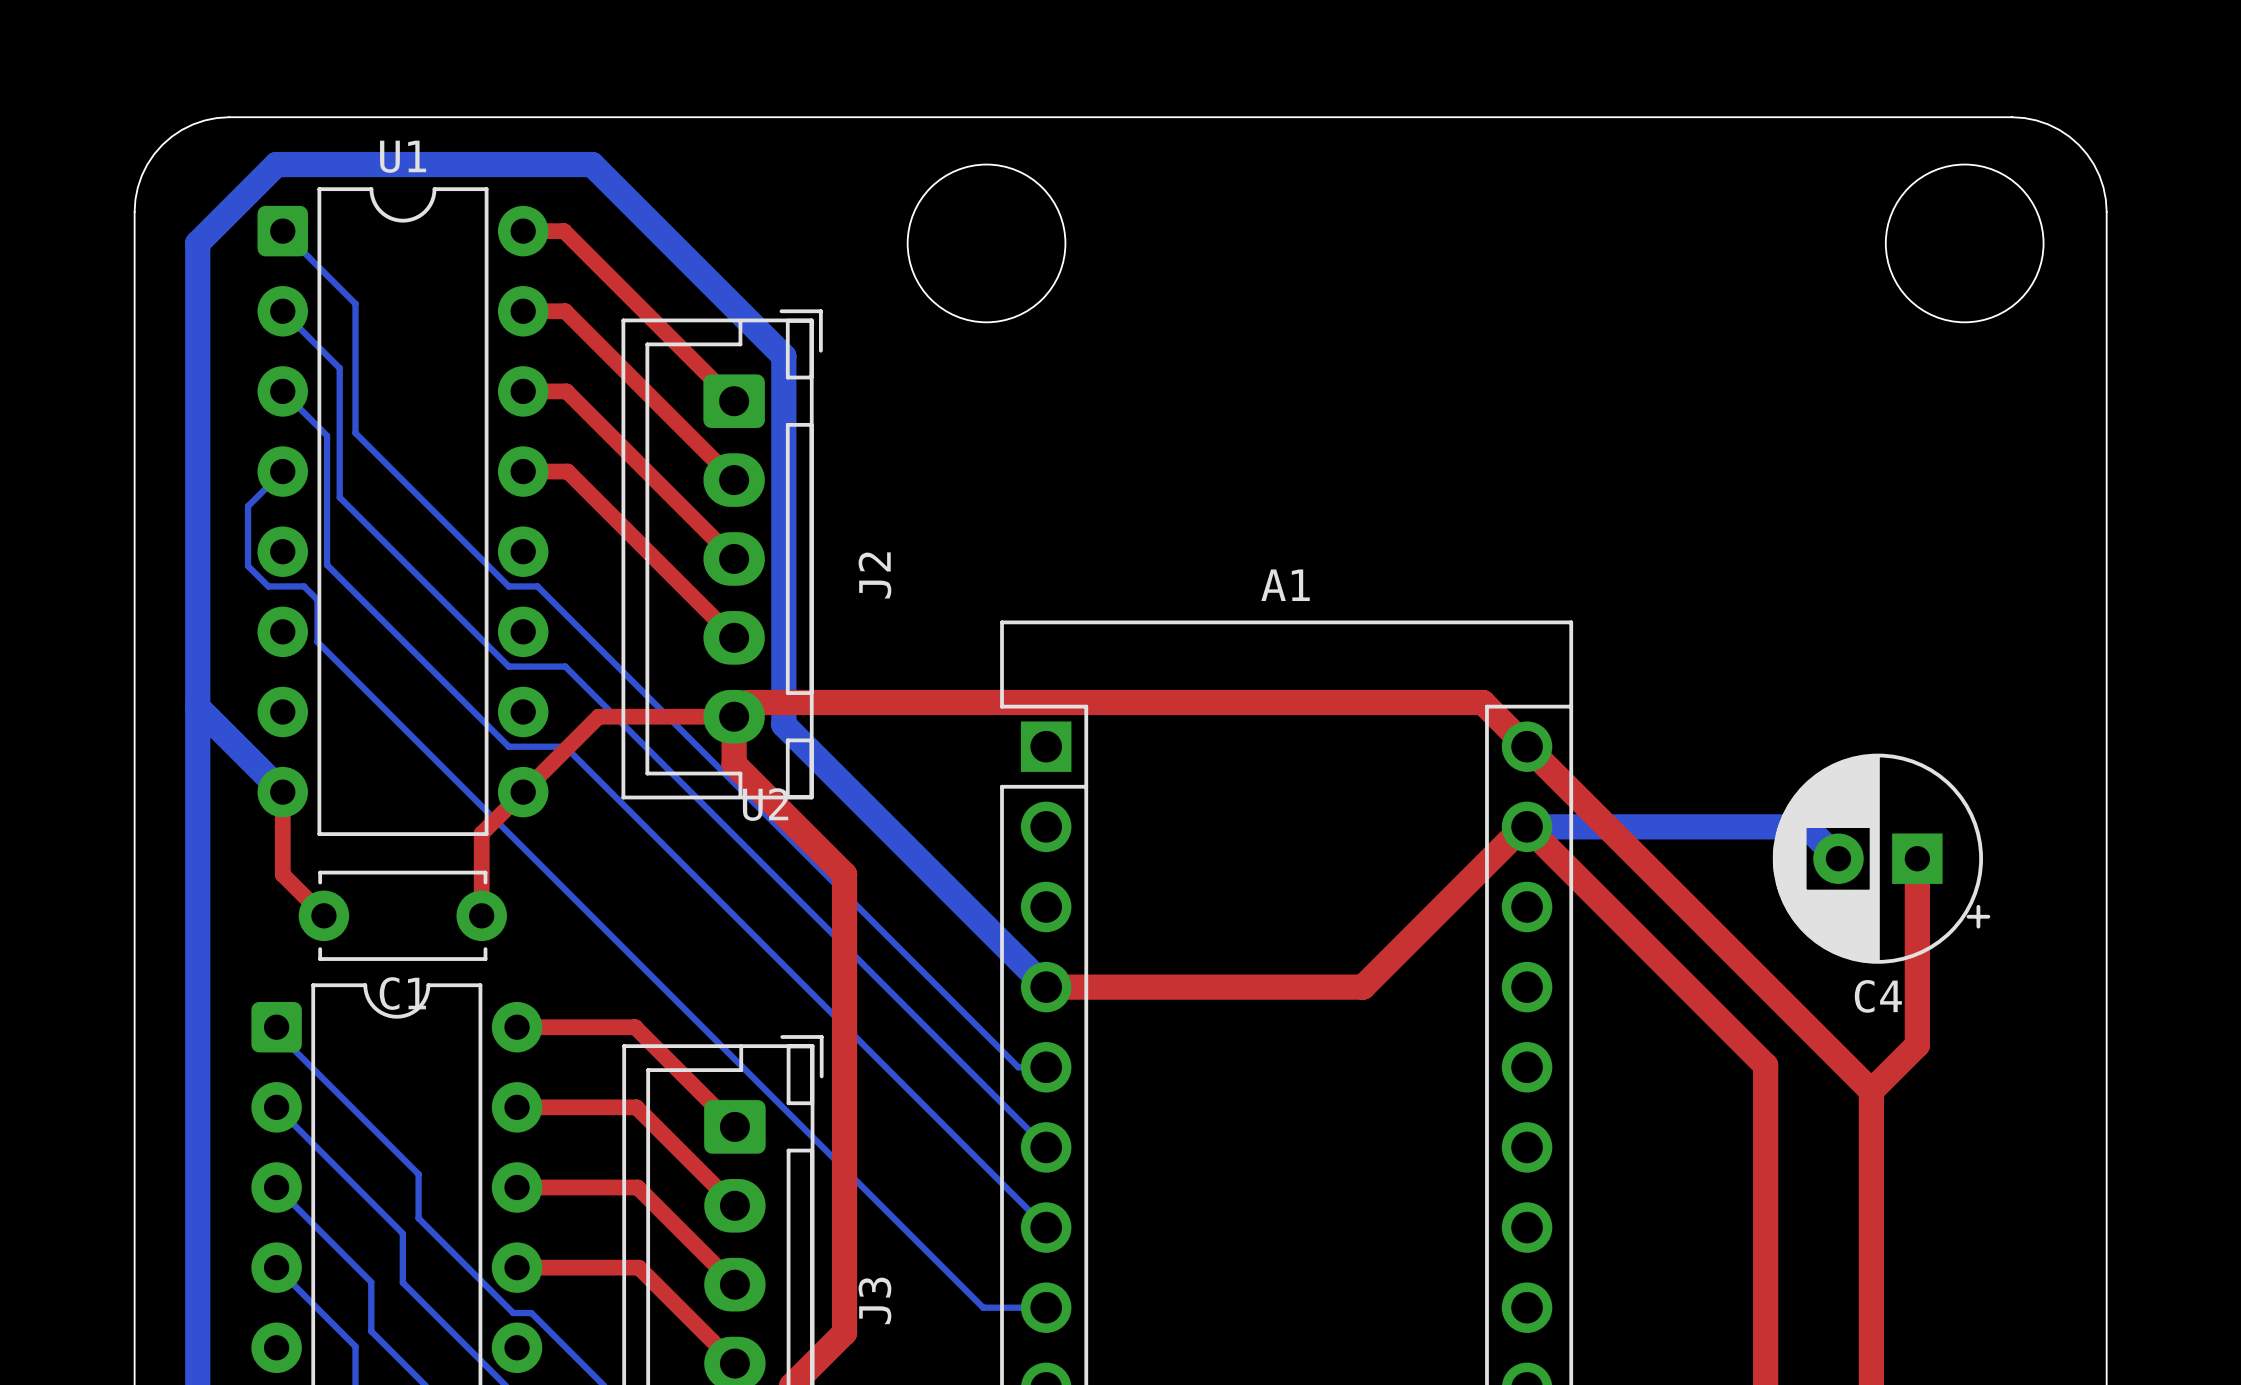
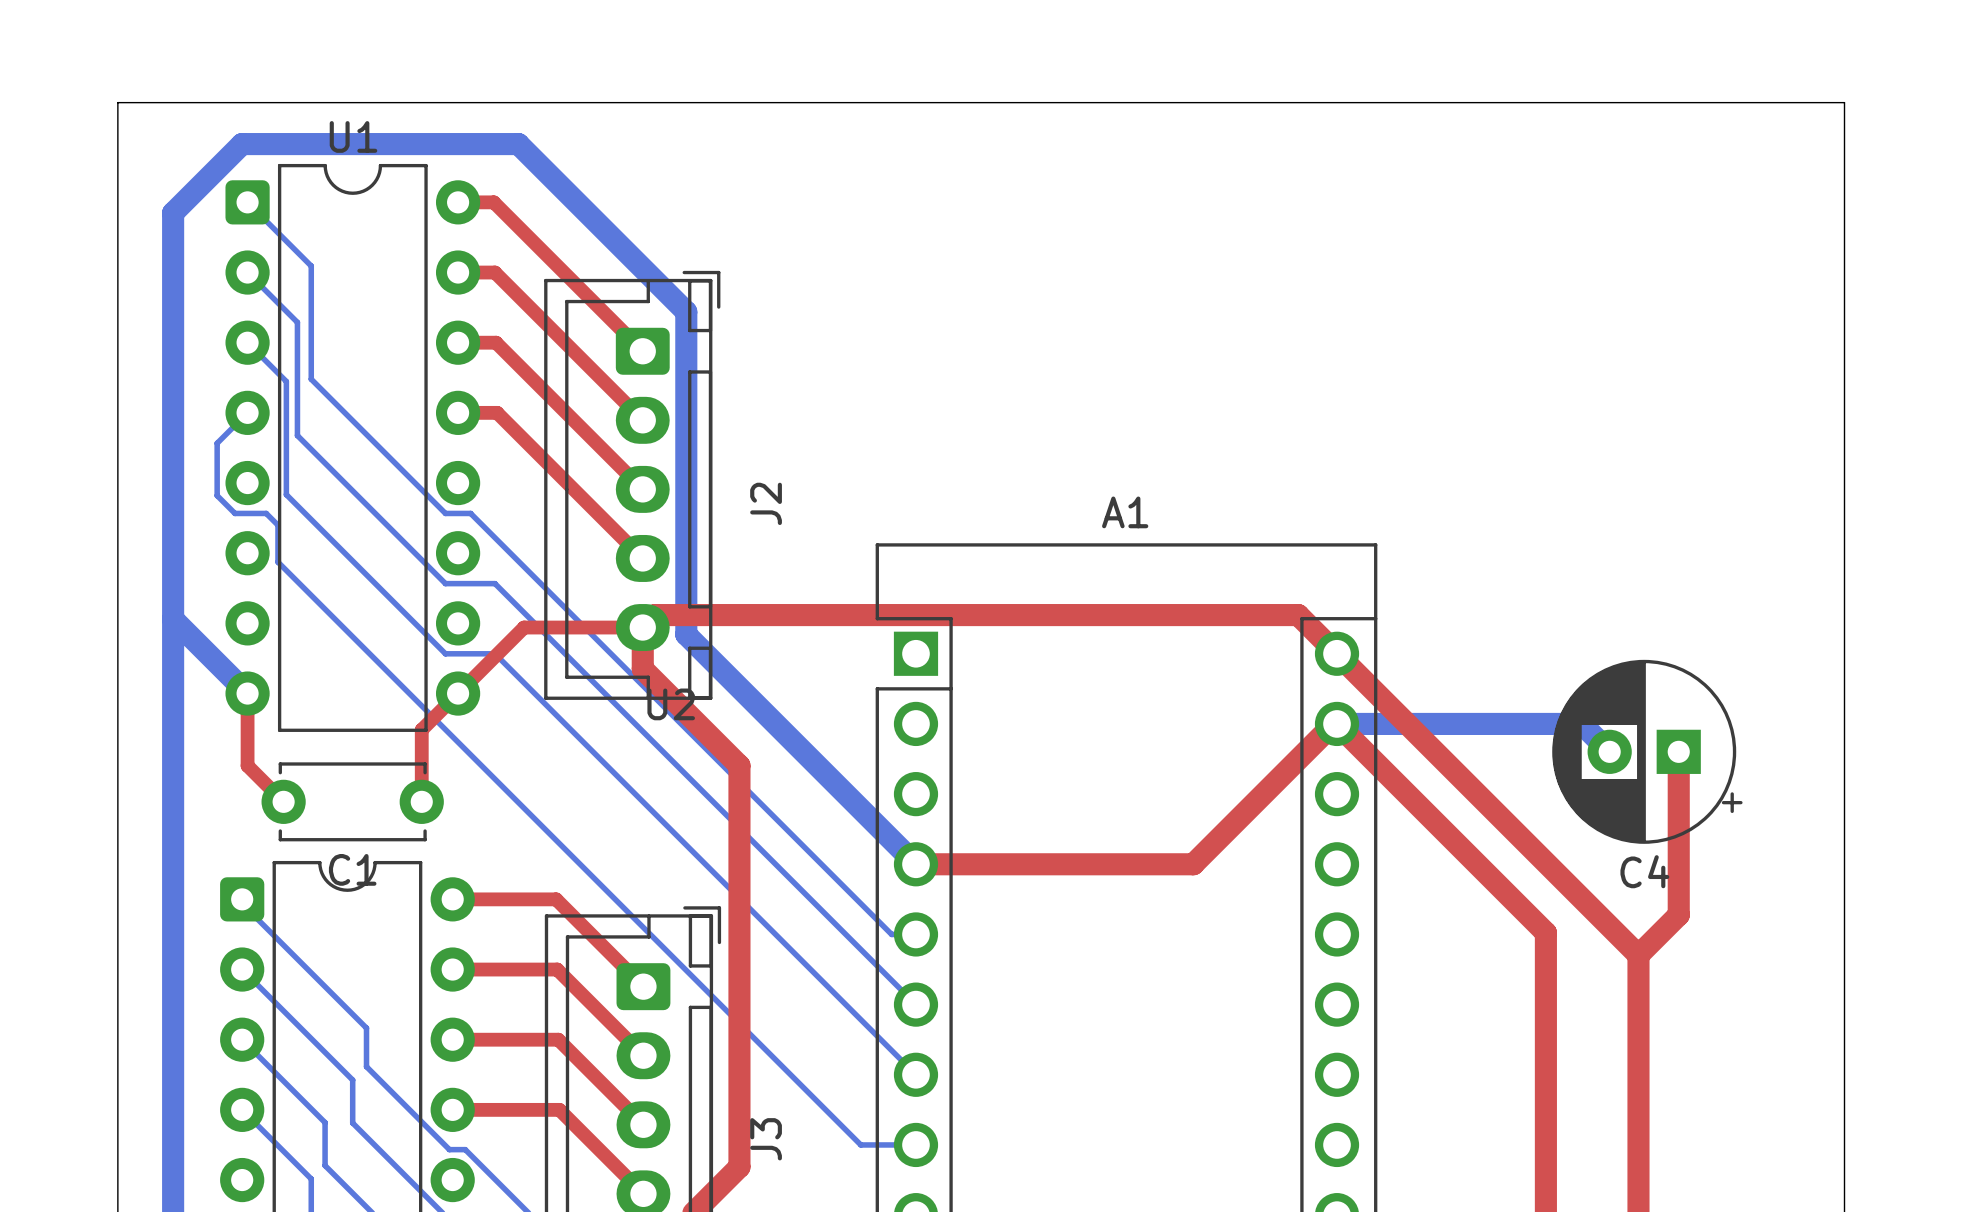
board edge: (229, 117) (216, 118) (193, 124) (171, 136) (162, 144) (154, 154) (141, 175) (137, 187) (134, 211) -> (200, 102) (117, 102) (117, 185)
board edge: (2012, 117) (2036, 120) (2048, 124) (2059, 129) (2078, 144) (2087, 154) (2099, 175) (2103, 187) (2106, 211) -> (1761, 102) (1844, 102) (1844, 185)
round board edge: [906, 163, 1067, 324] -> none
round board edge: [1885, 163, 2045, 324] -> none

